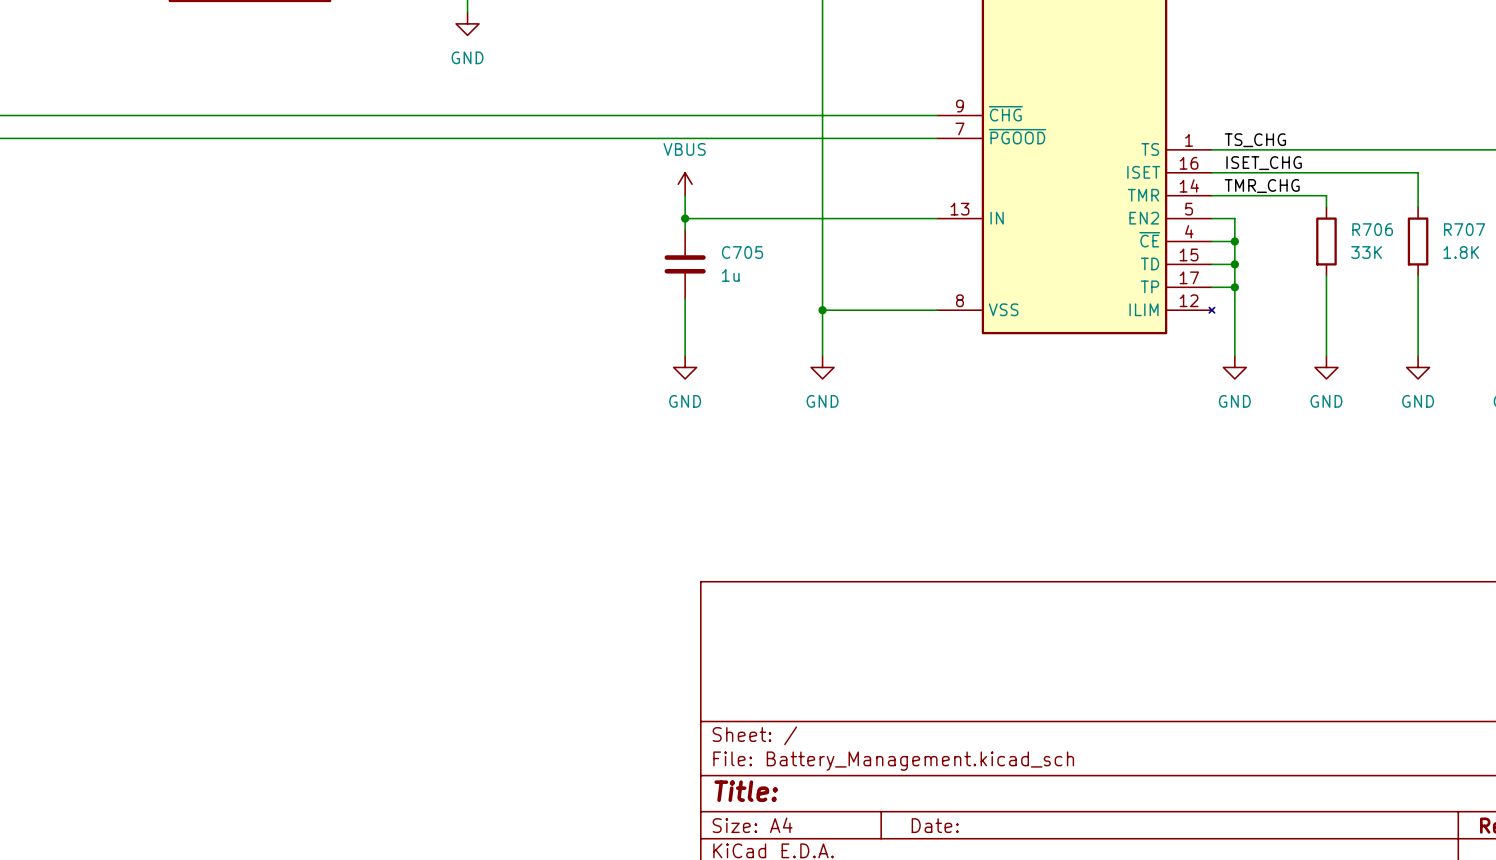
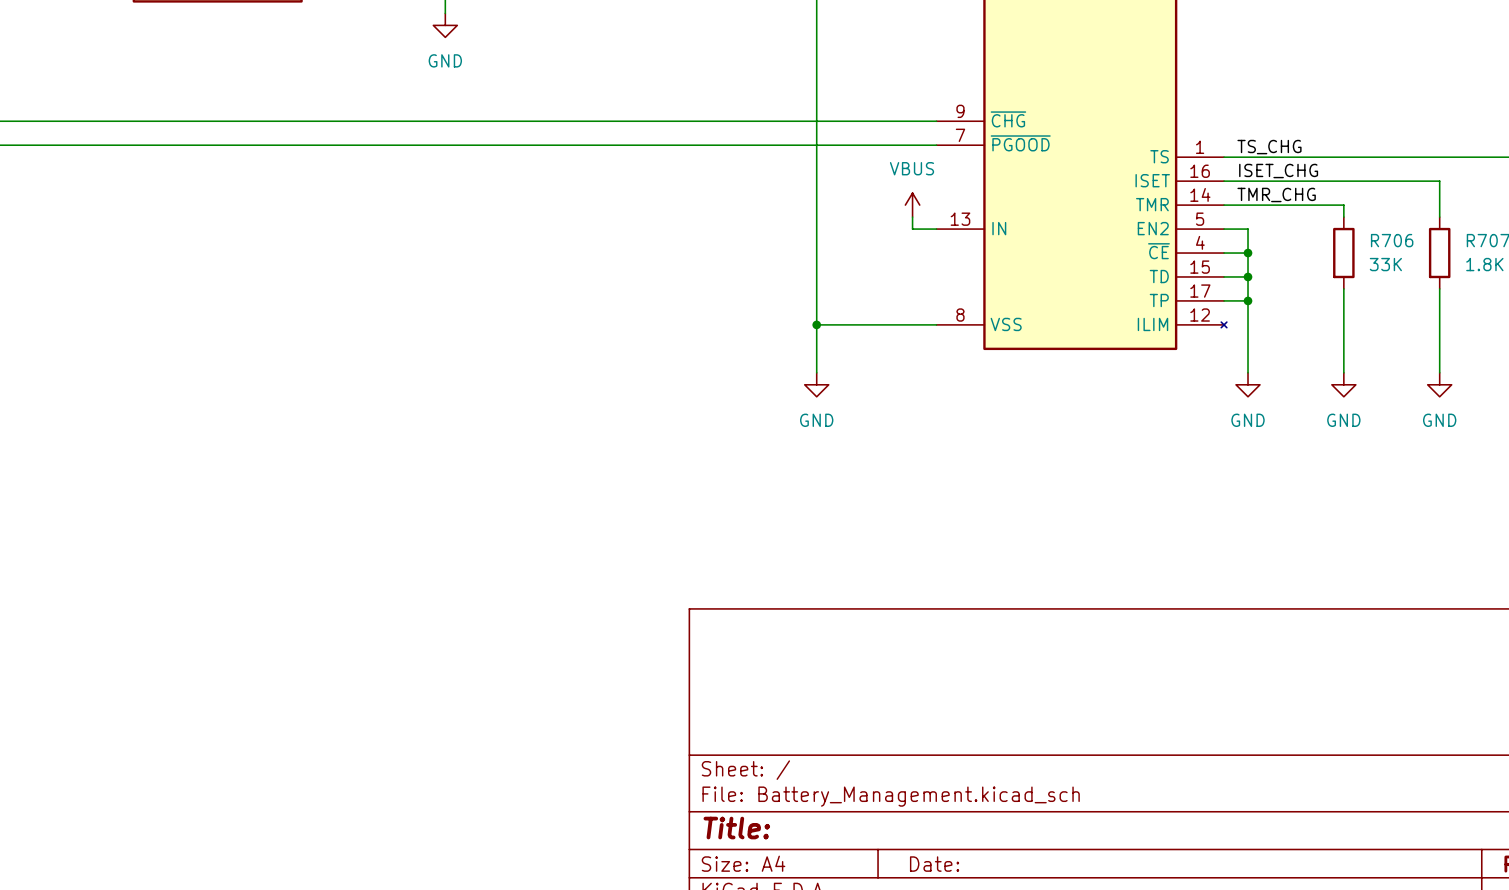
power symbol: VBUS (685, 184) -> none
wire: (685, 195) (685, 230) -> none
power symbol: none -> VBUS (912, 205)
wire: (685, 218) (914, 218) -> (912, 217) (912, 229)
junction: (685, 218) -> none
C705: 1u (685, 264) -> none
wire: (685, 298) (685, 356) -> none
power symbol: GND (685, 367) -> none

